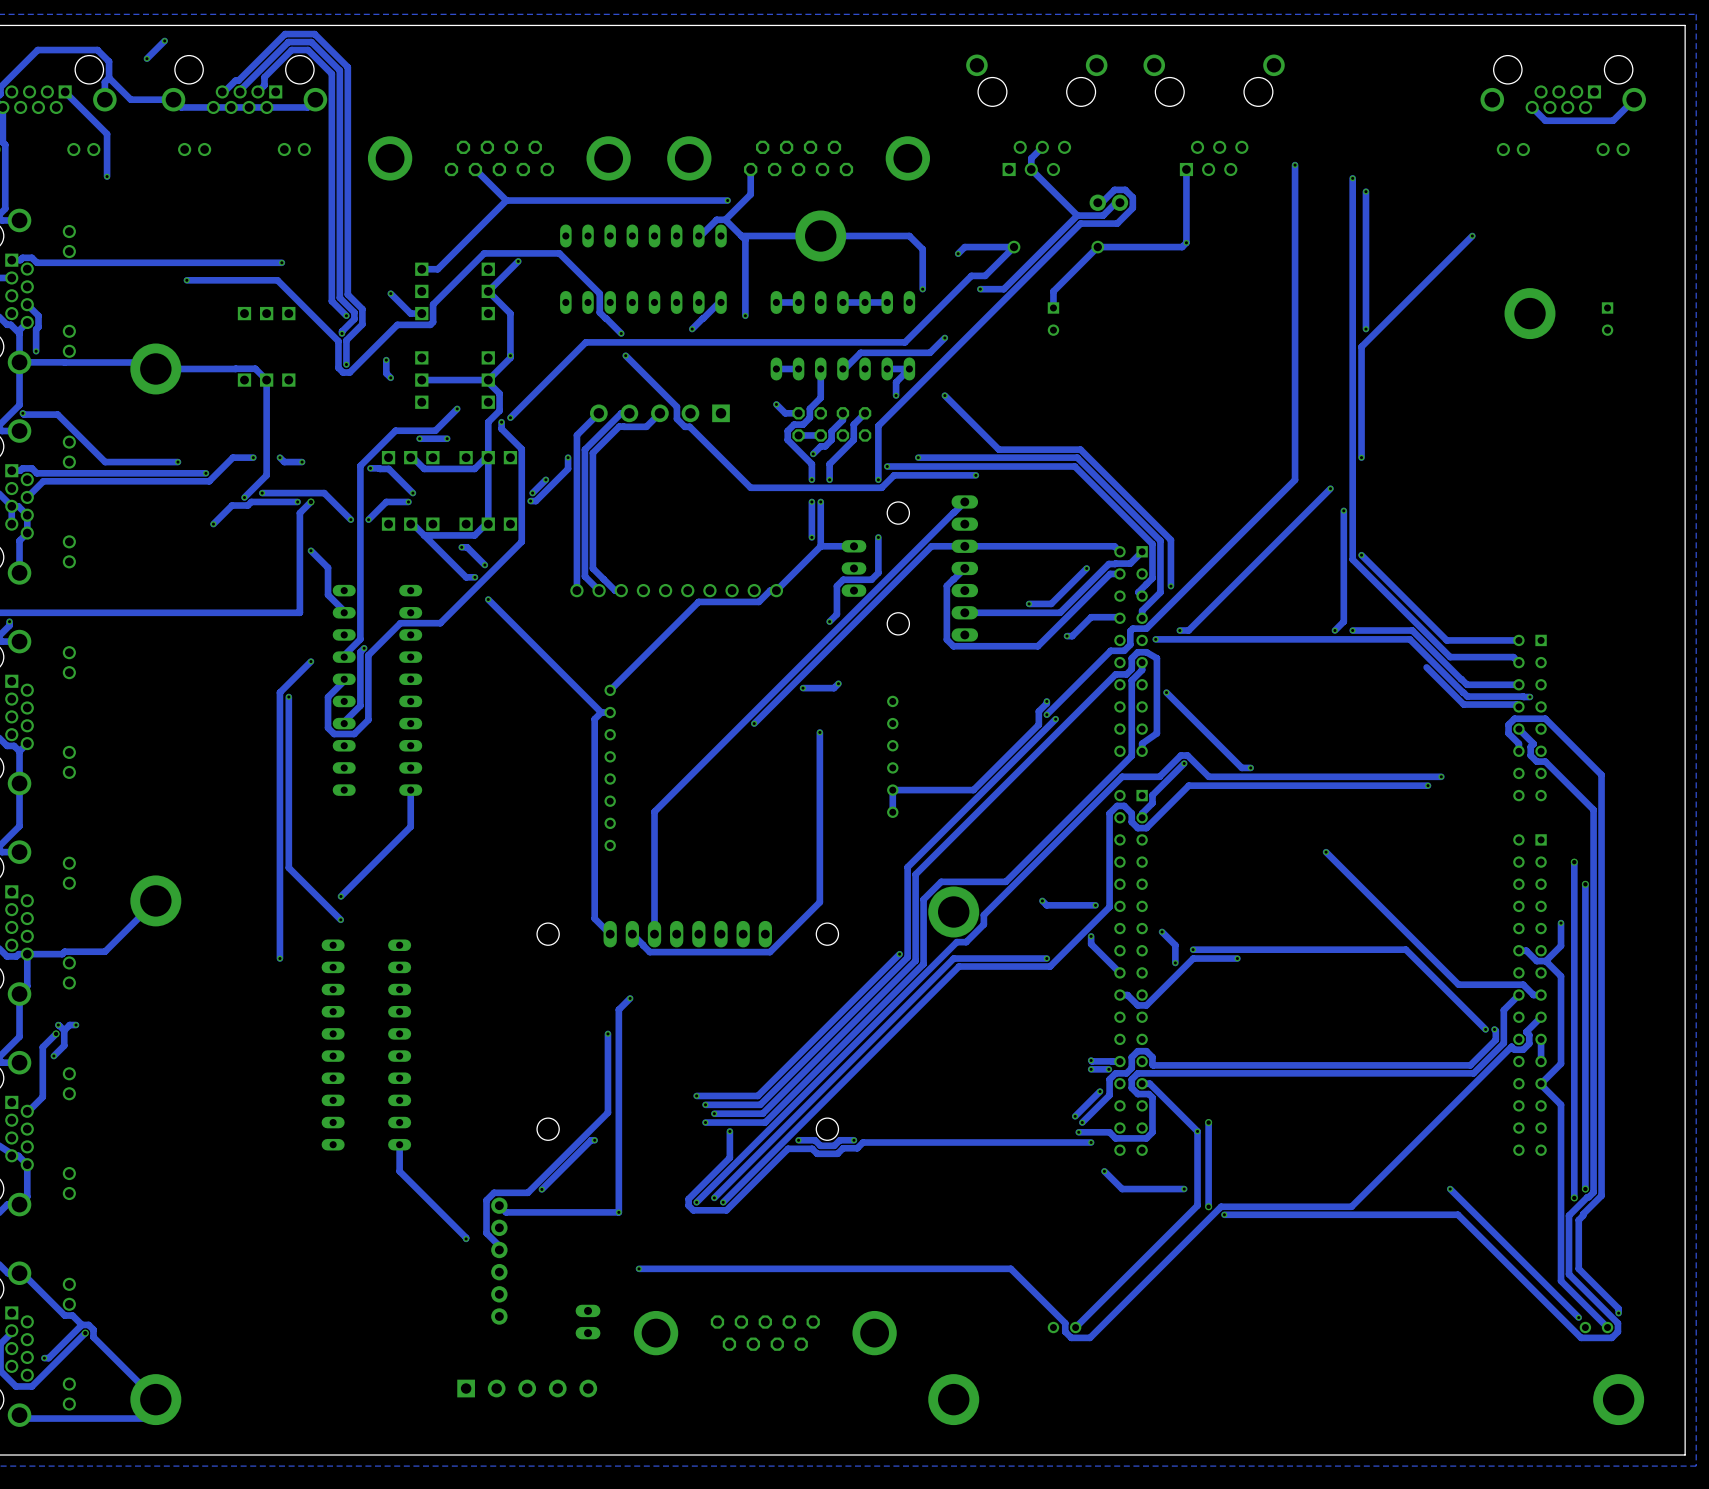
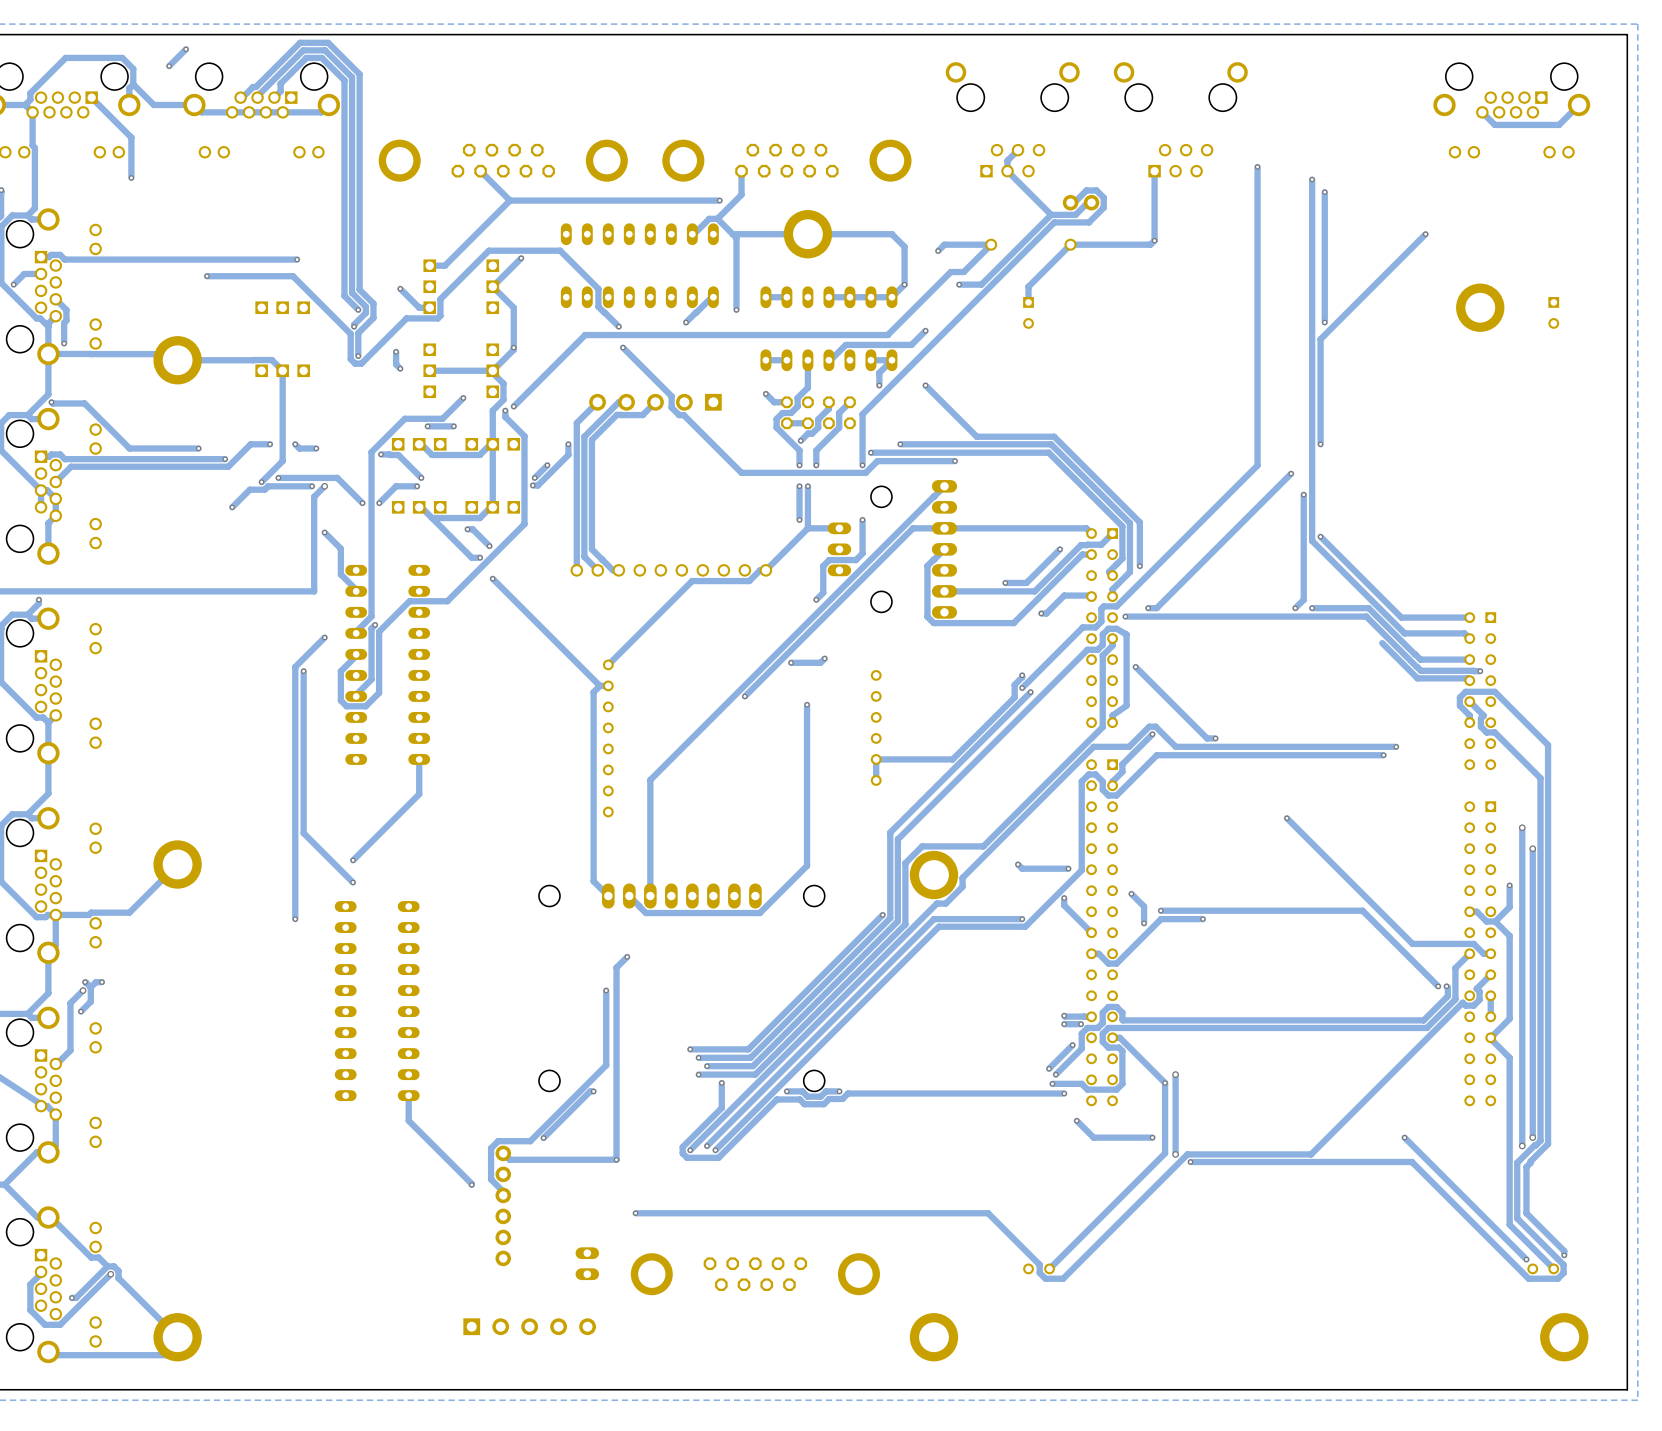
track: none -> (904, 284) (891, 297) (870, 297)

